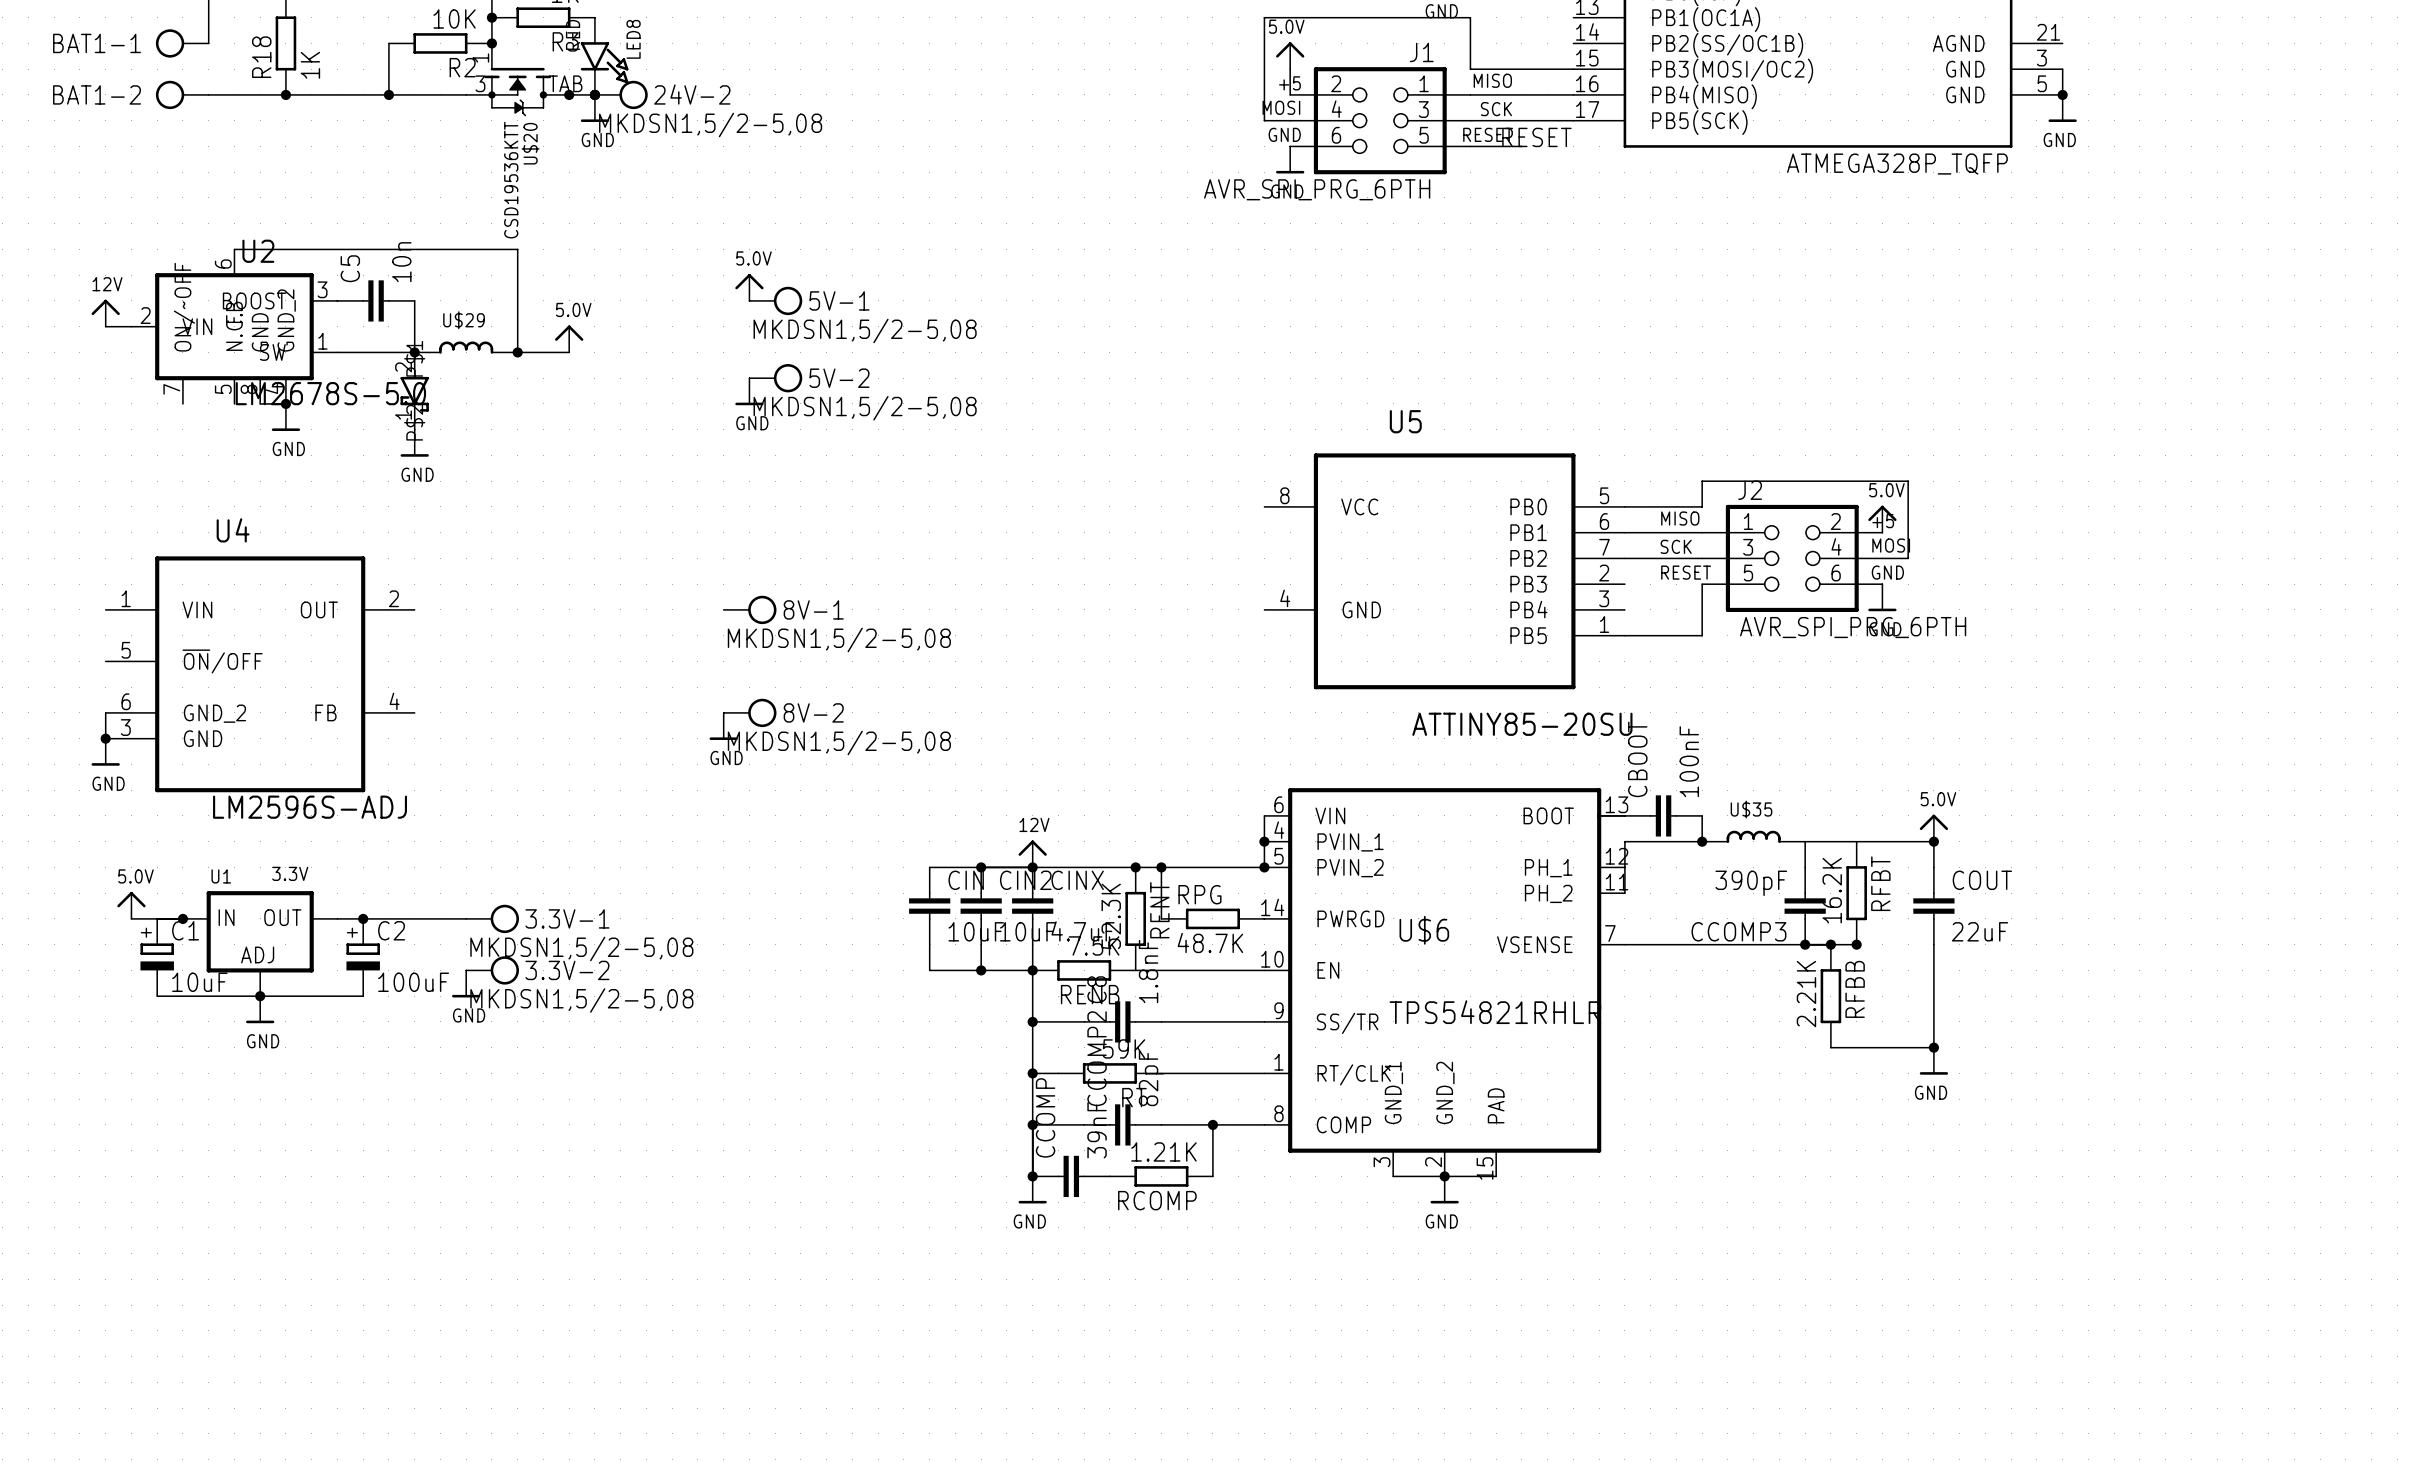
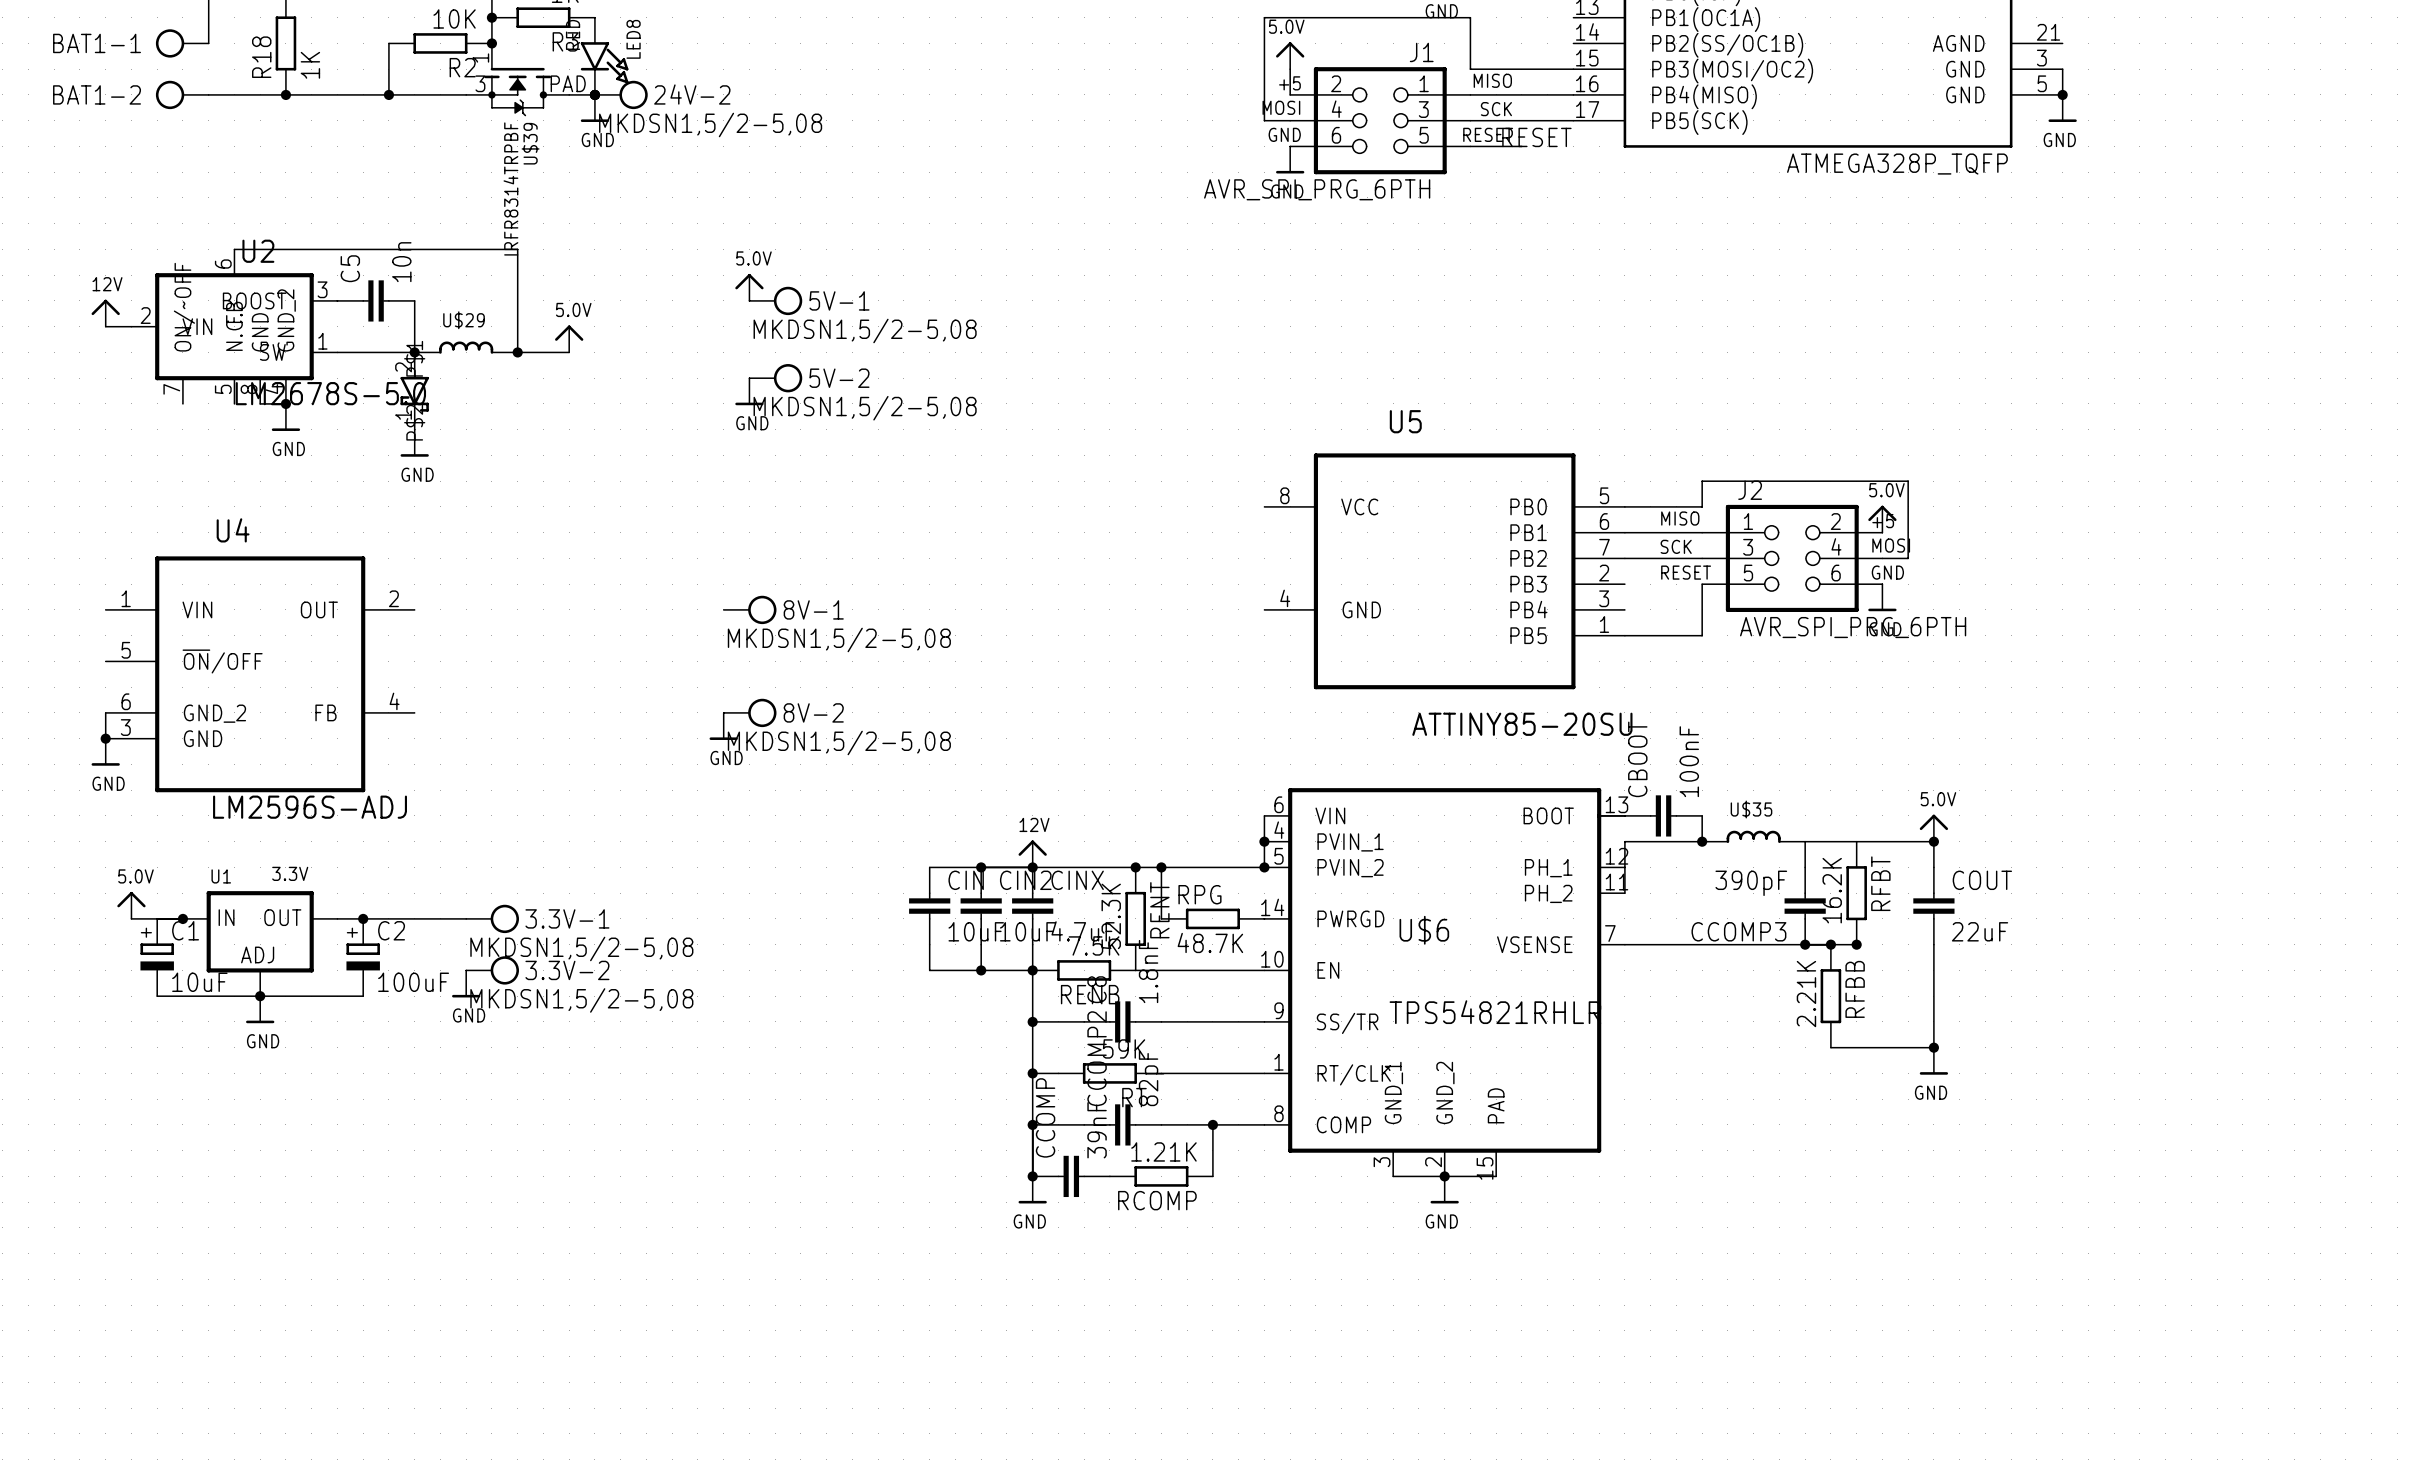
U$20 pin number: TAB (565, 83) -> PAD (568, 83)
junction: (569, 94) -> none
U$20 name: U$20 (530, 143) -> U$39 (530, 143)
U$20 value: CSD19536KTT (511, 180) -> IRFR8314TRPBF (510, 188)

